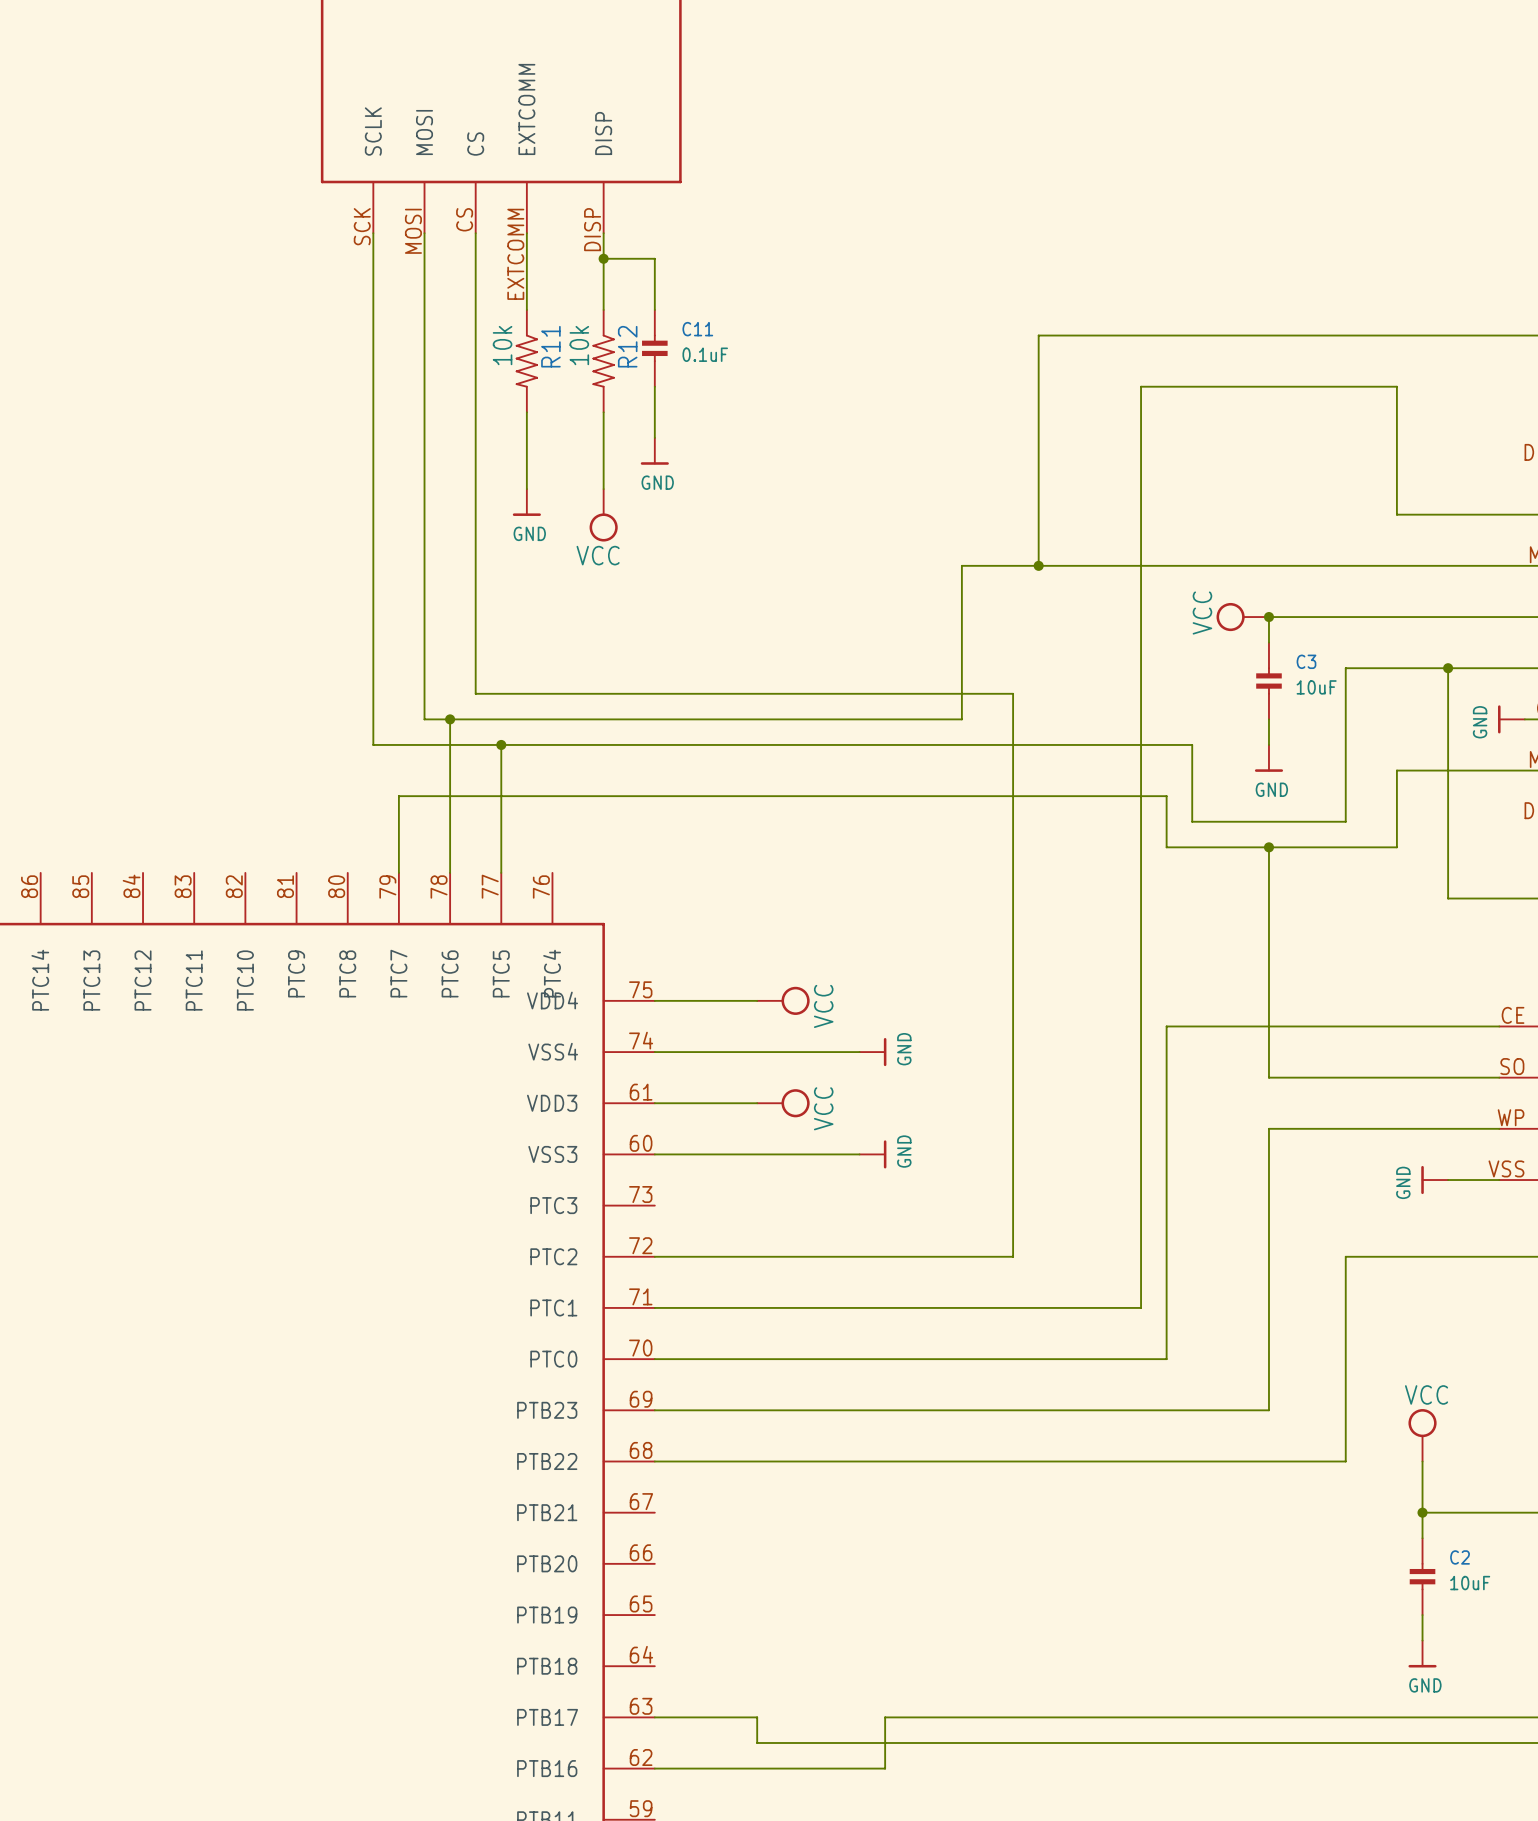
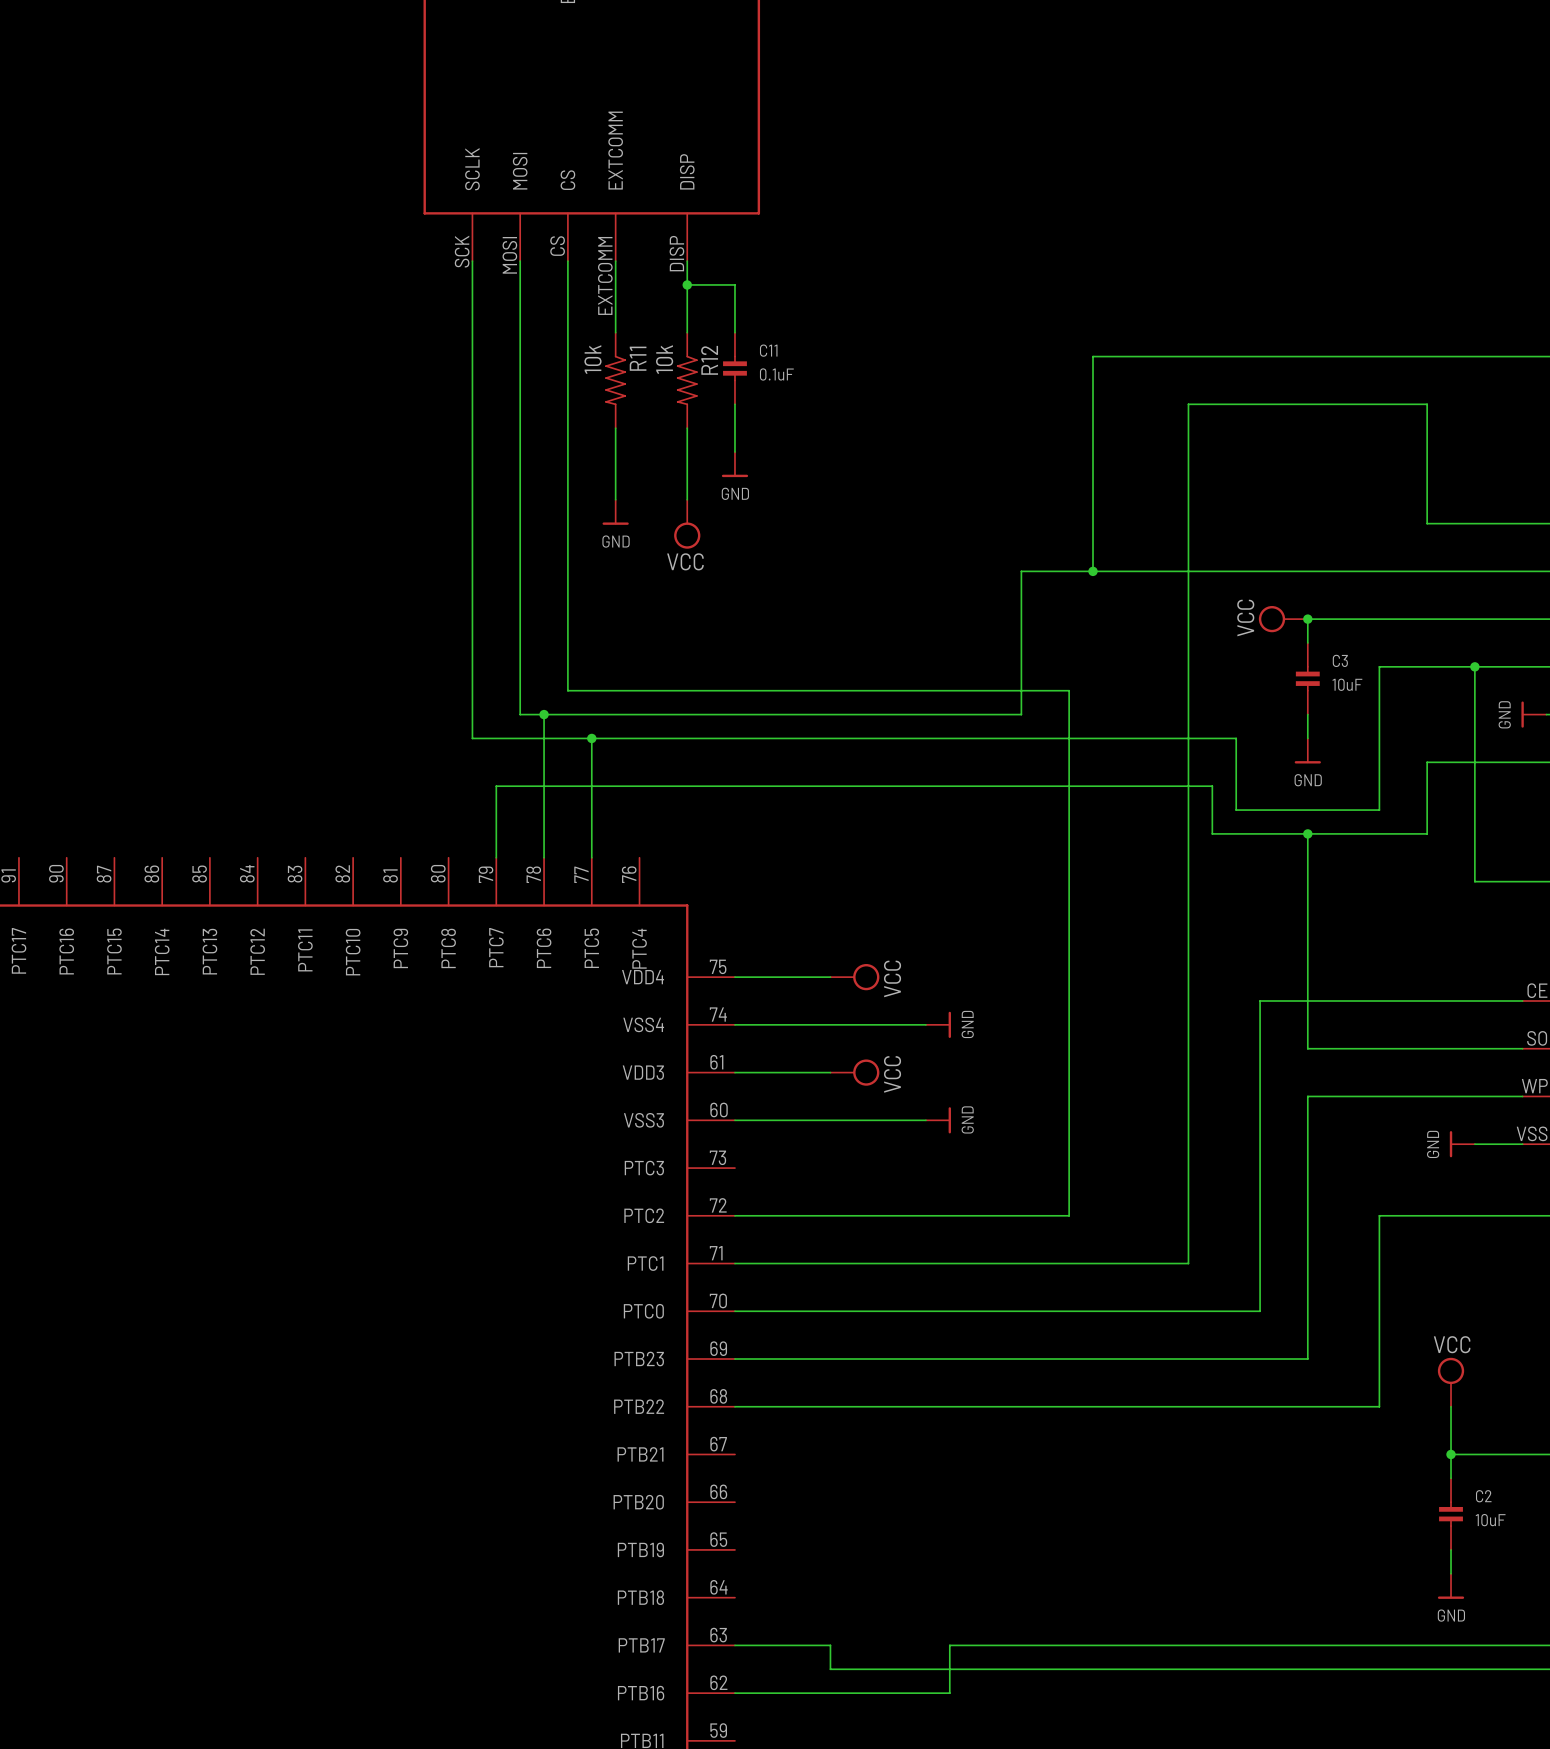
wire: (1217, 1026) (1166, 1026) (1166, 1359) -> (1260, 1000) (1260, 1311) (1212, 1311)

